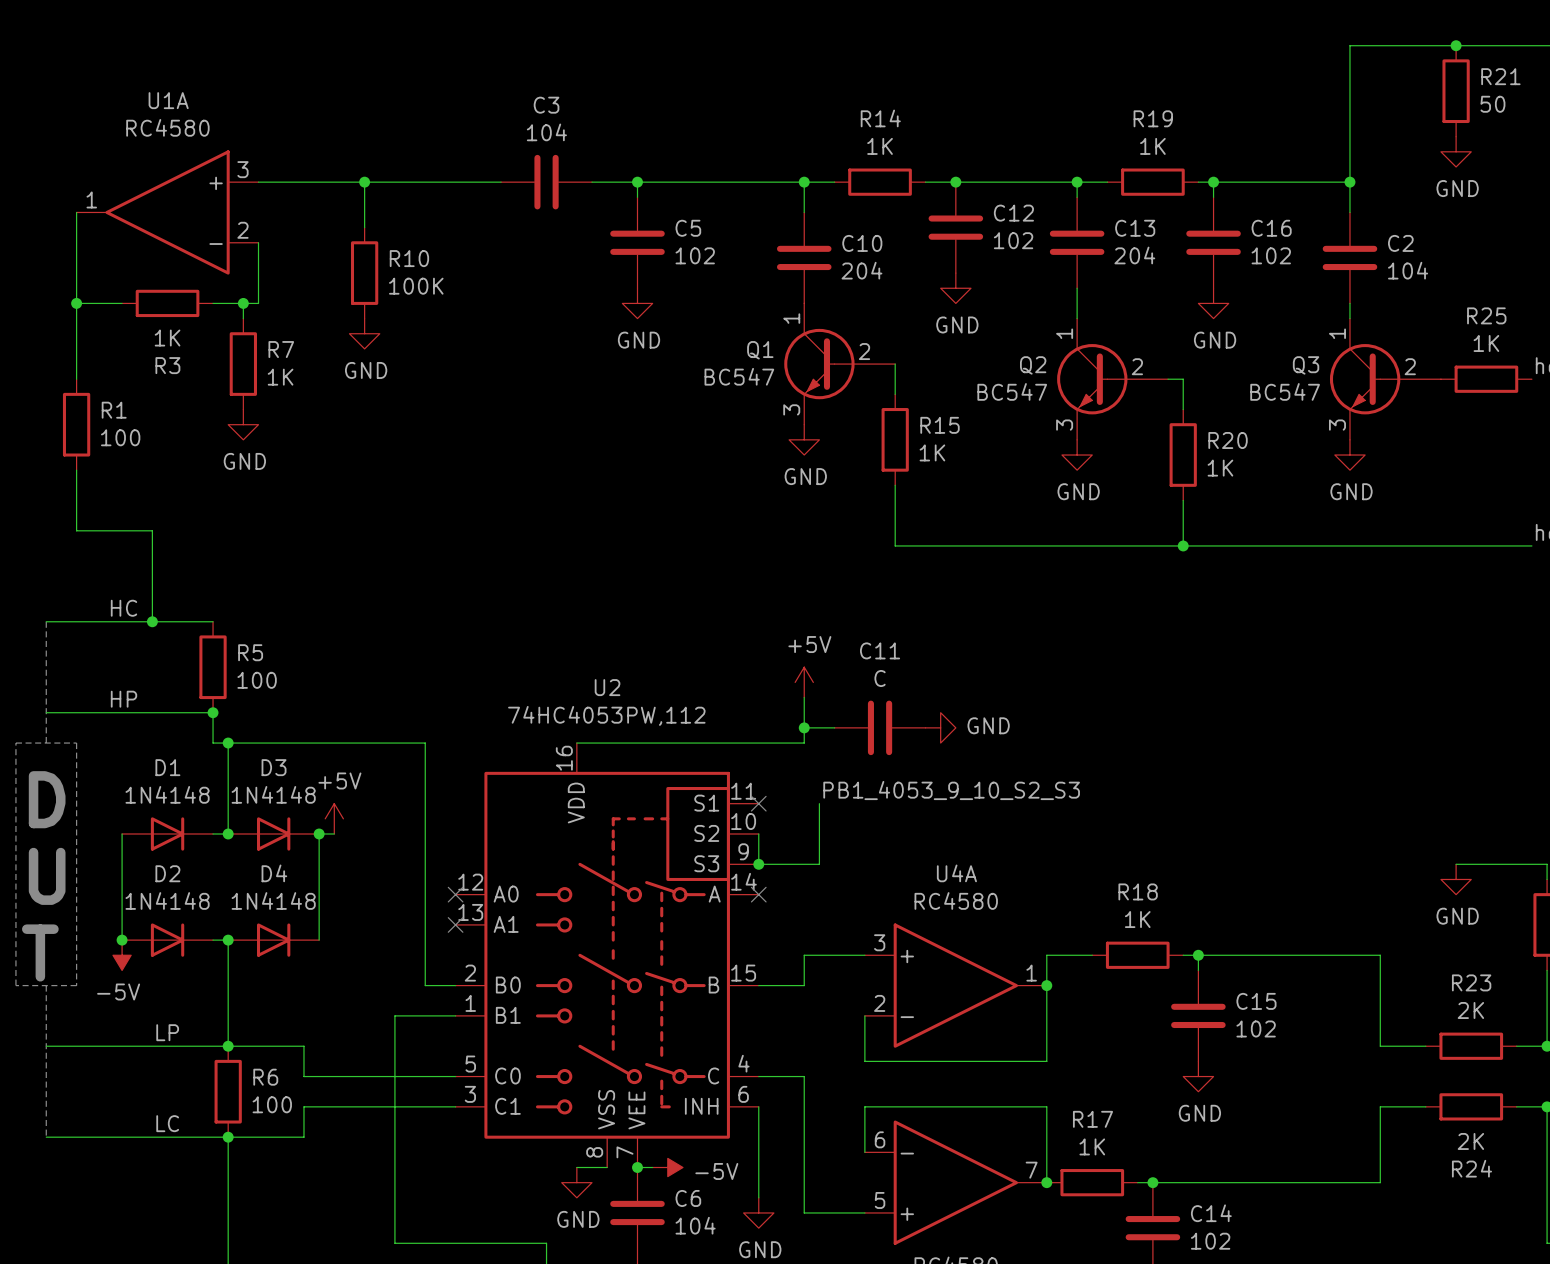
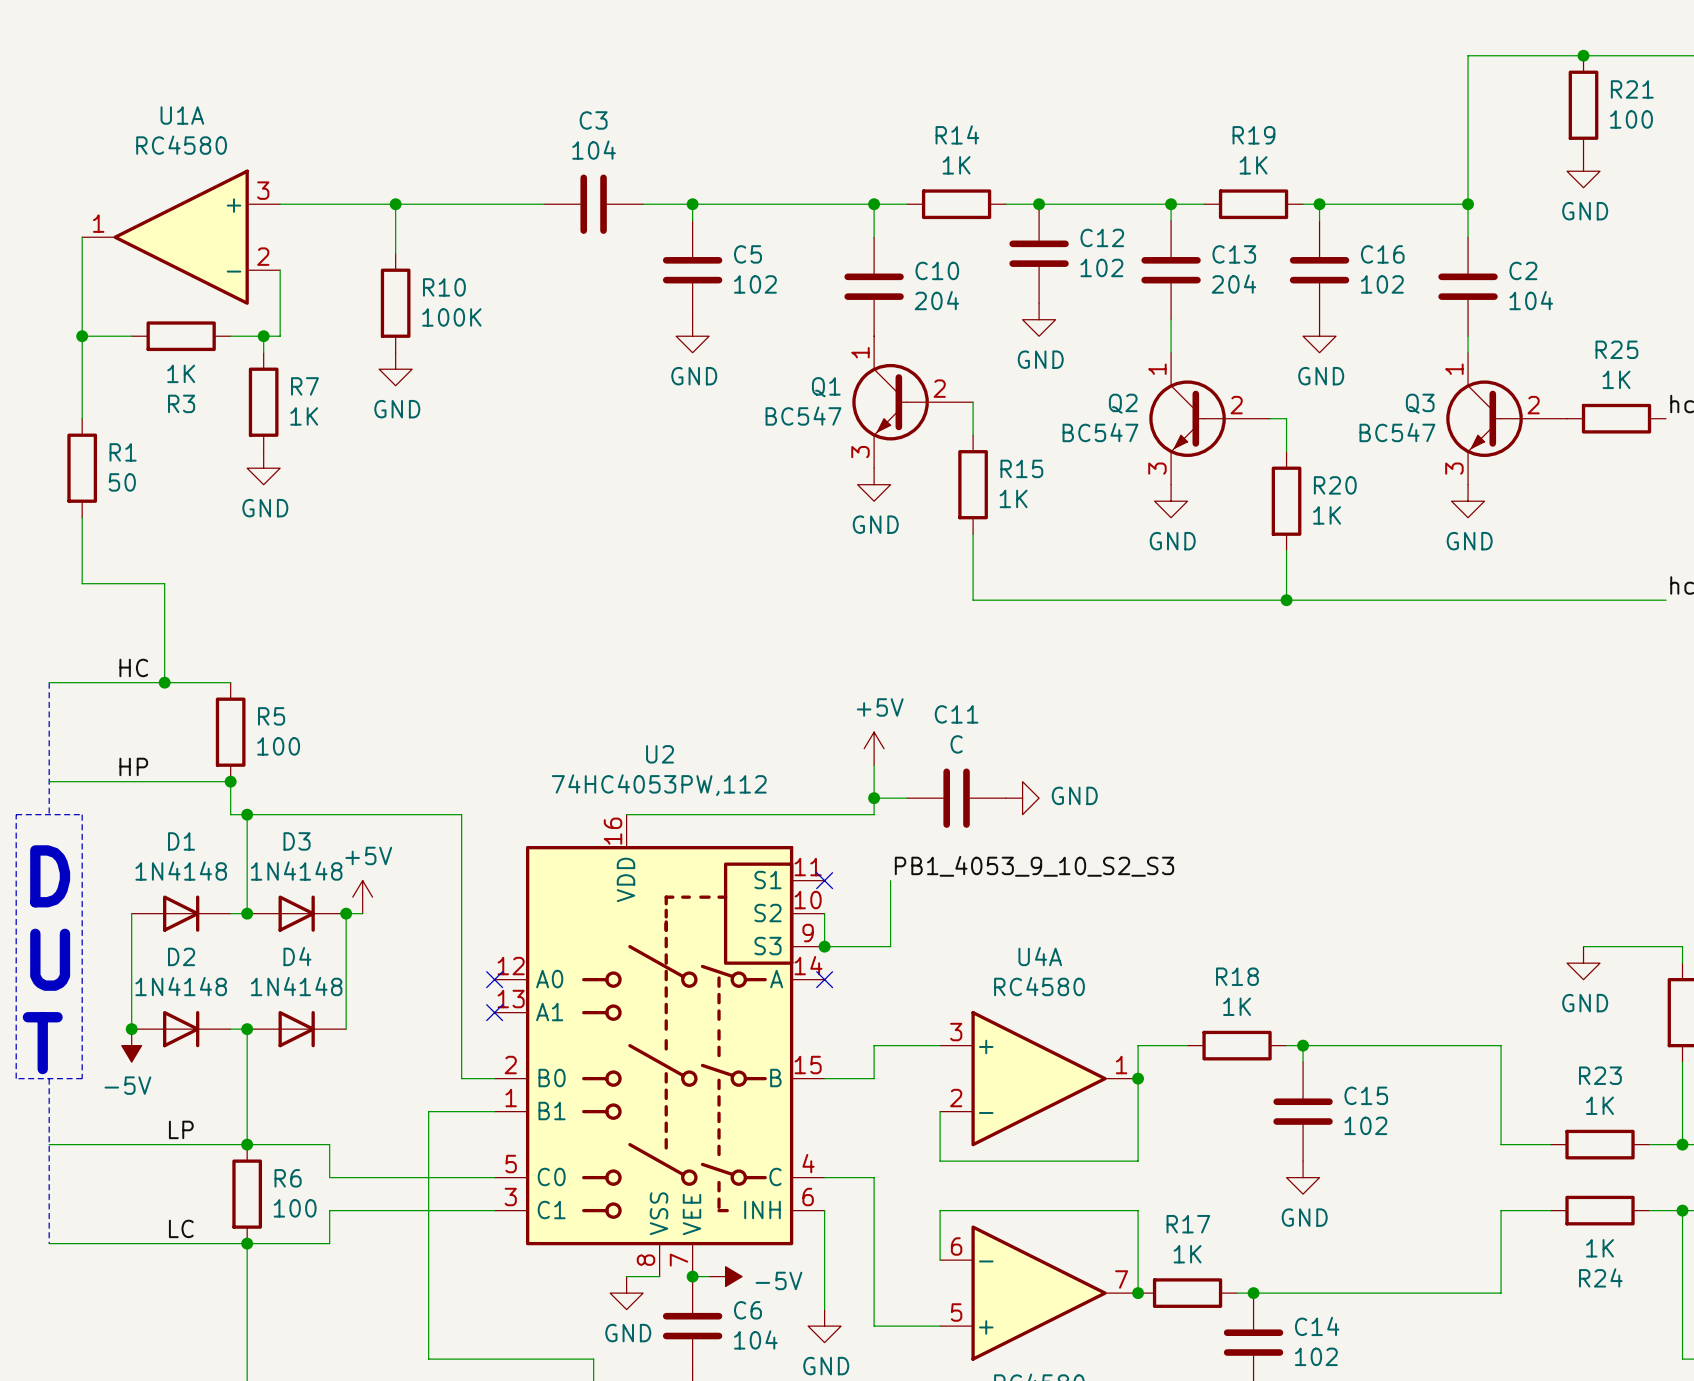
R21 value: 50 (1492, 104) -> 100 (1631, 119)
R1 value: 100 (120, 437) -> 50 (122, 482)
R23 value: 2K (1470, 1010) -> 1K (1600, 1105)
R24 value: 2K (1470, 1141) -> 1K (1600, 1248)

